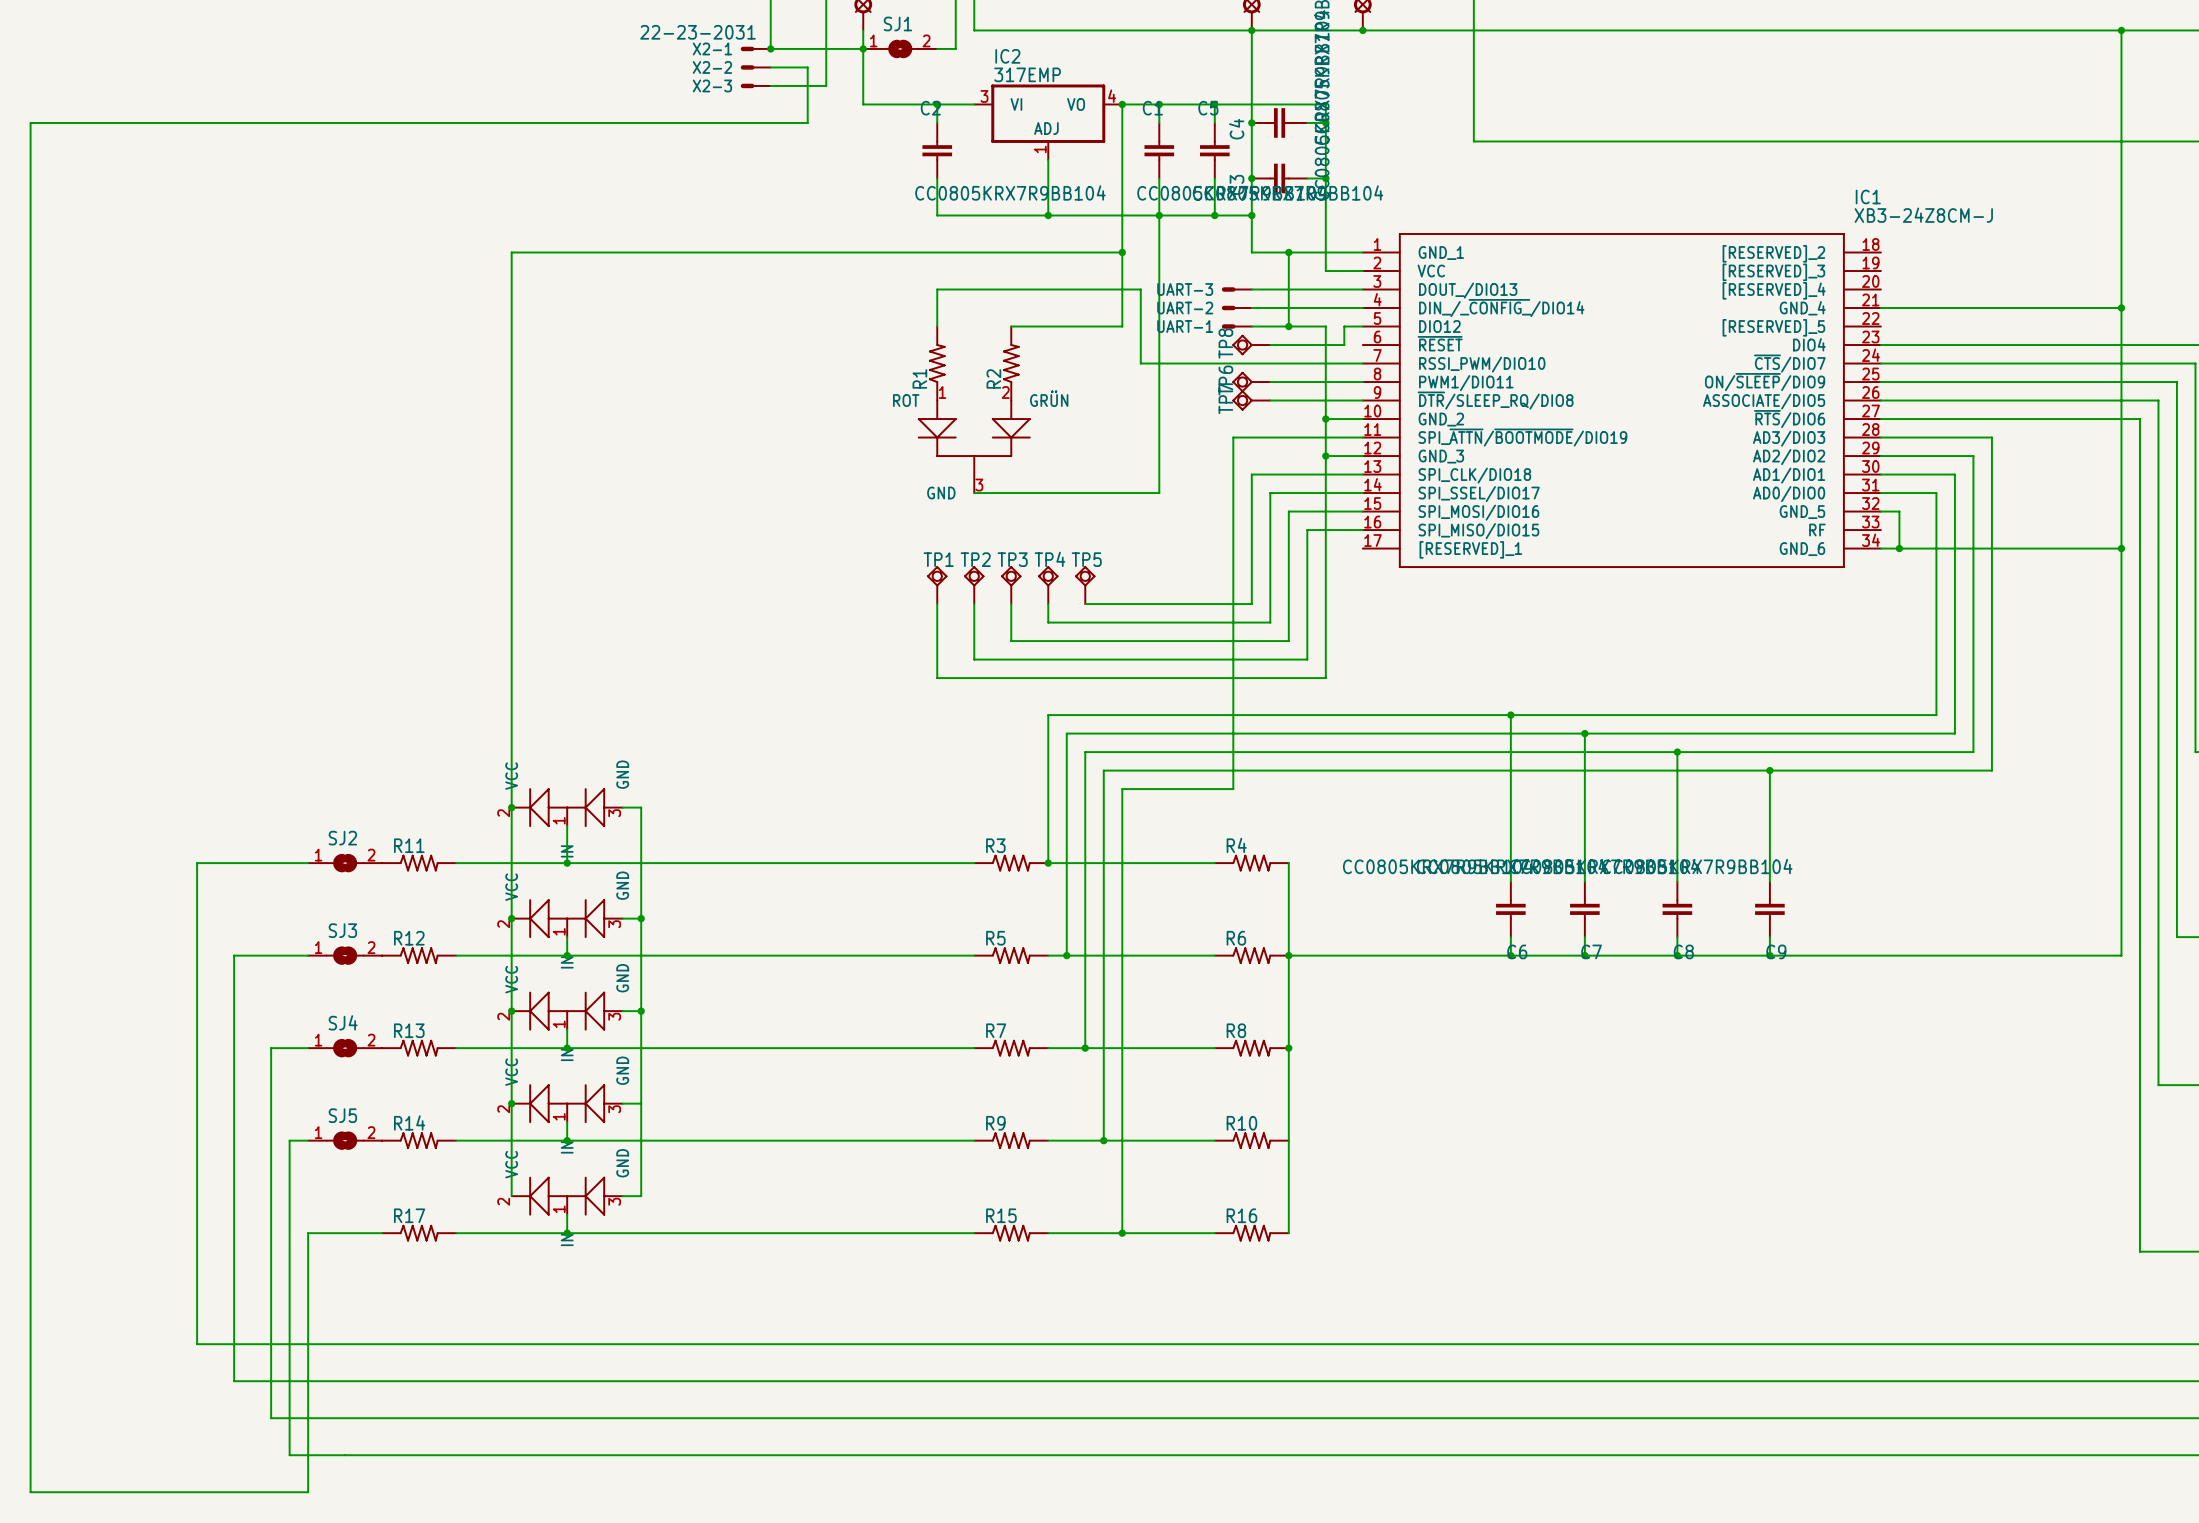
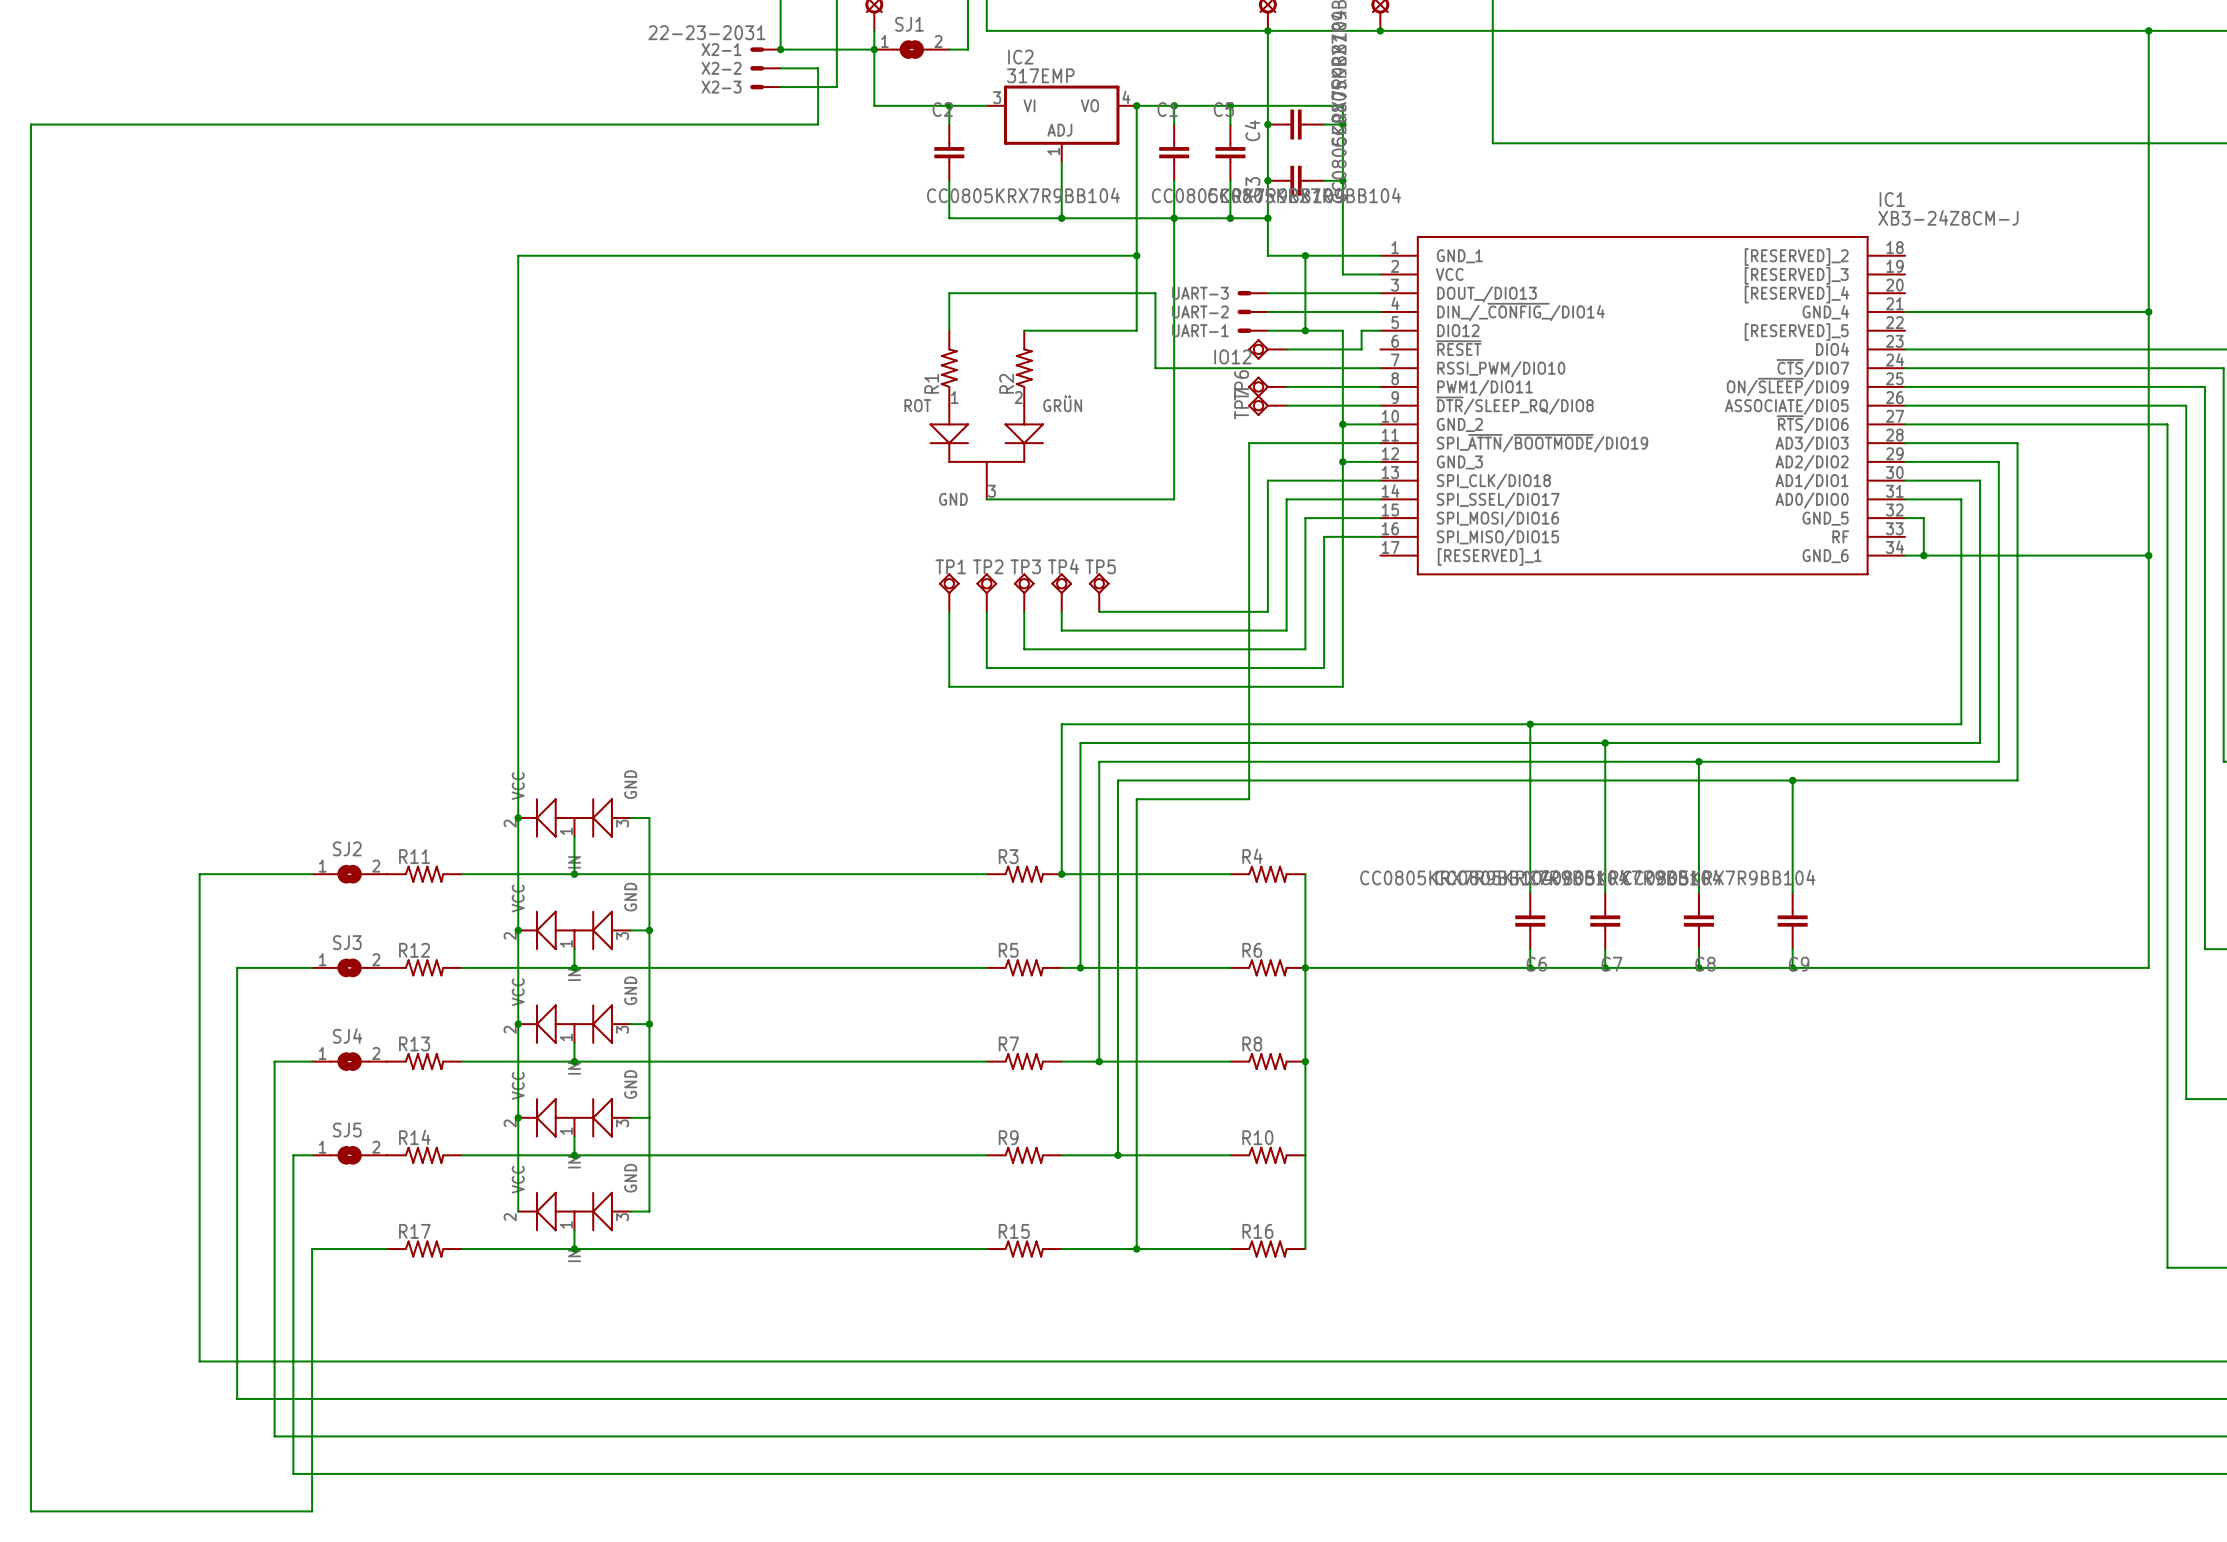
TP8 name: TP8 (1225, 343) -> IO12 (1232, 356)

